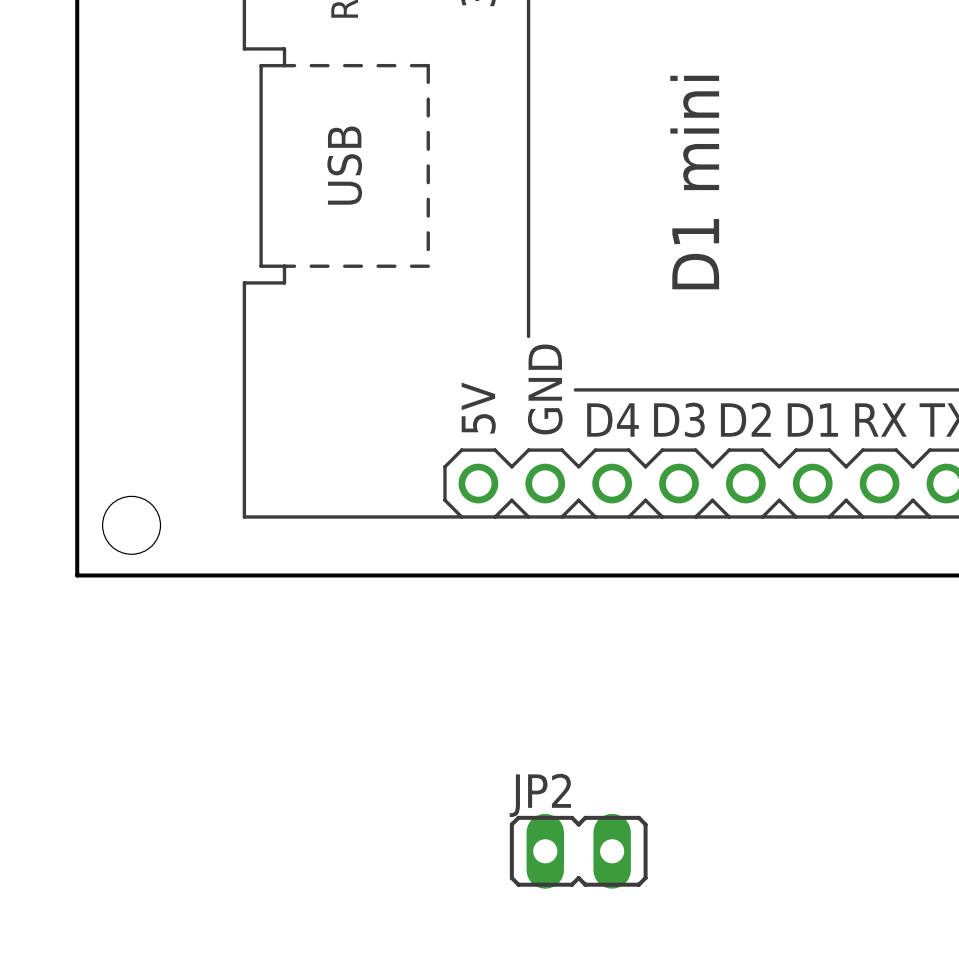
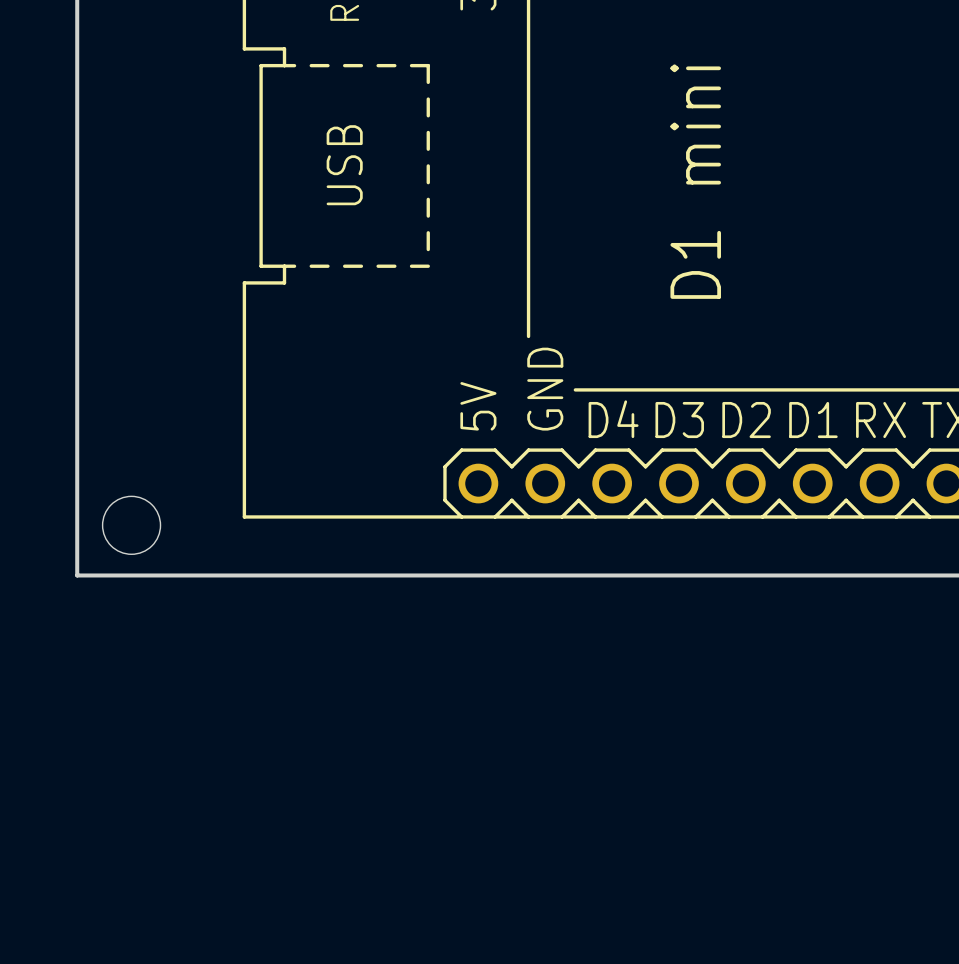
JP2: (578, 851) -> none

